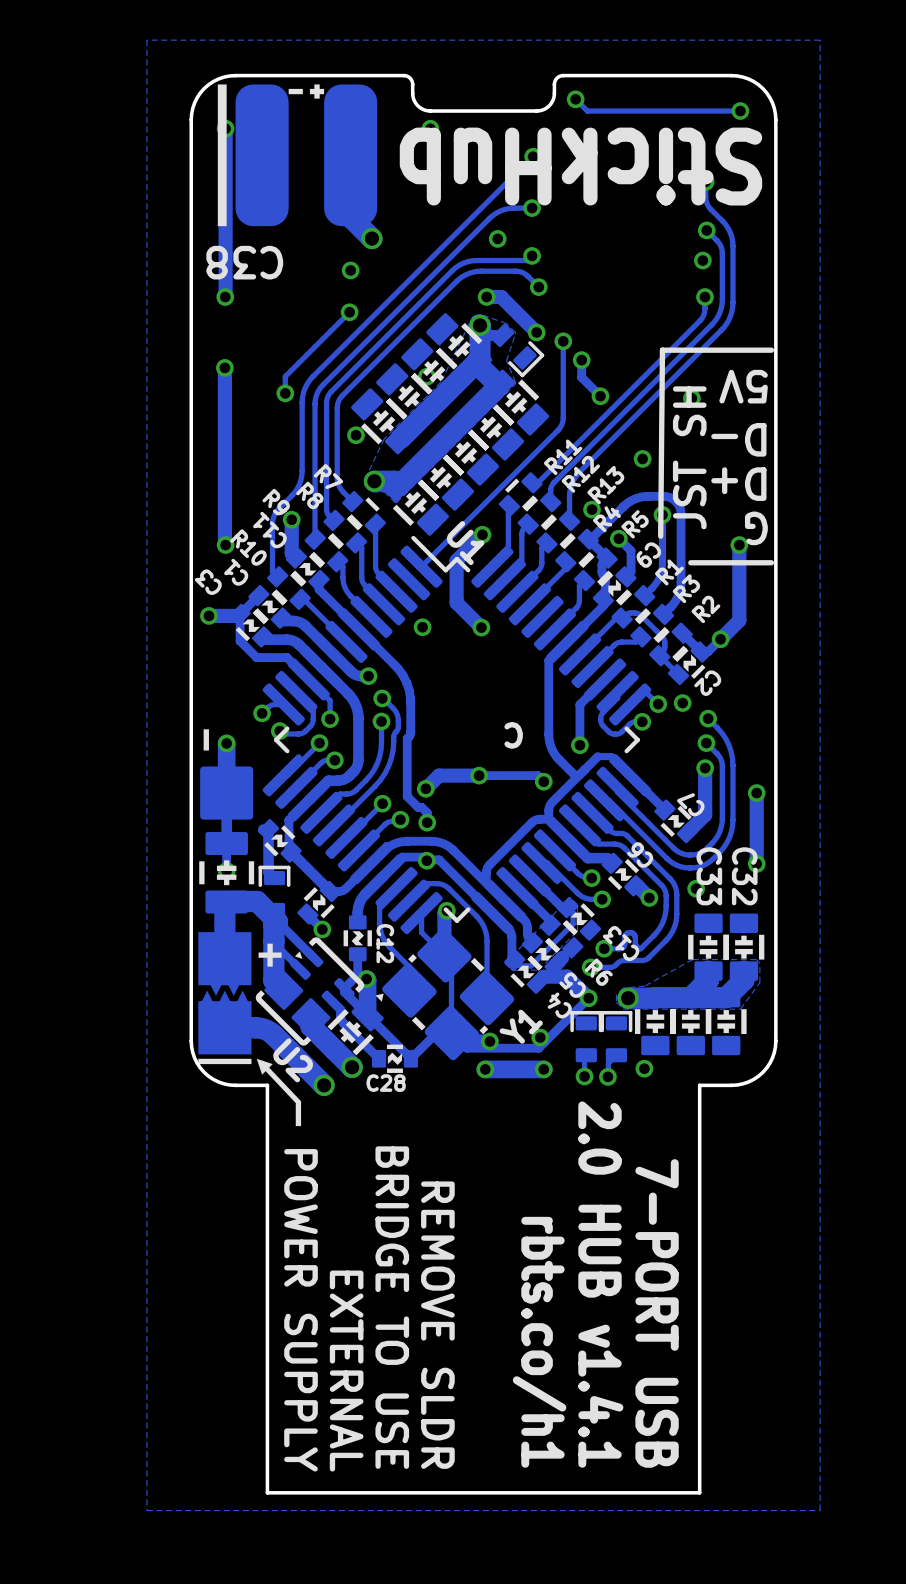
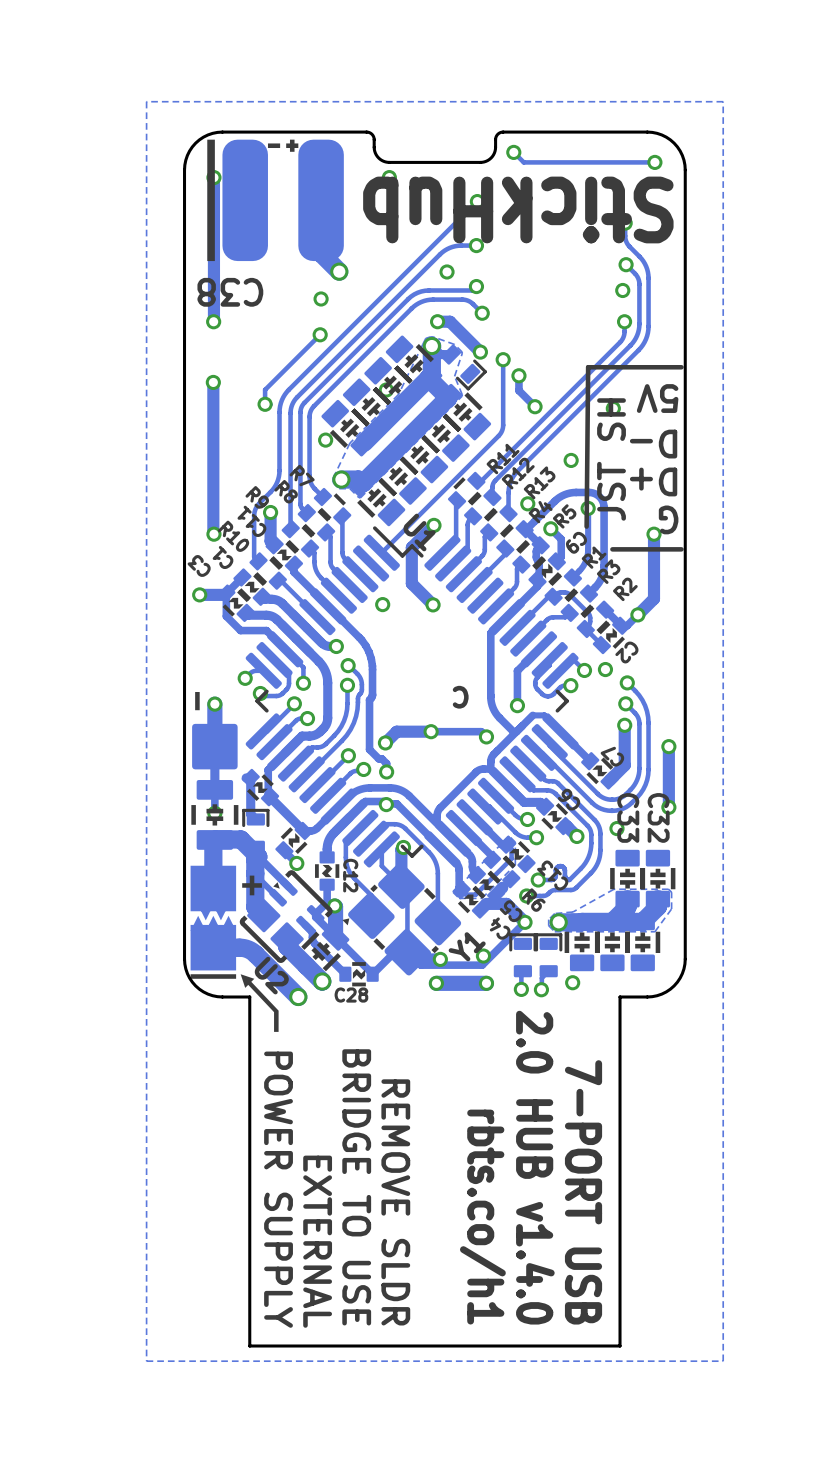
text: 2.0 HUB v1.4.1 (600, 1284) -> 2.0 HUB v1.4.0 (535, 1167)

